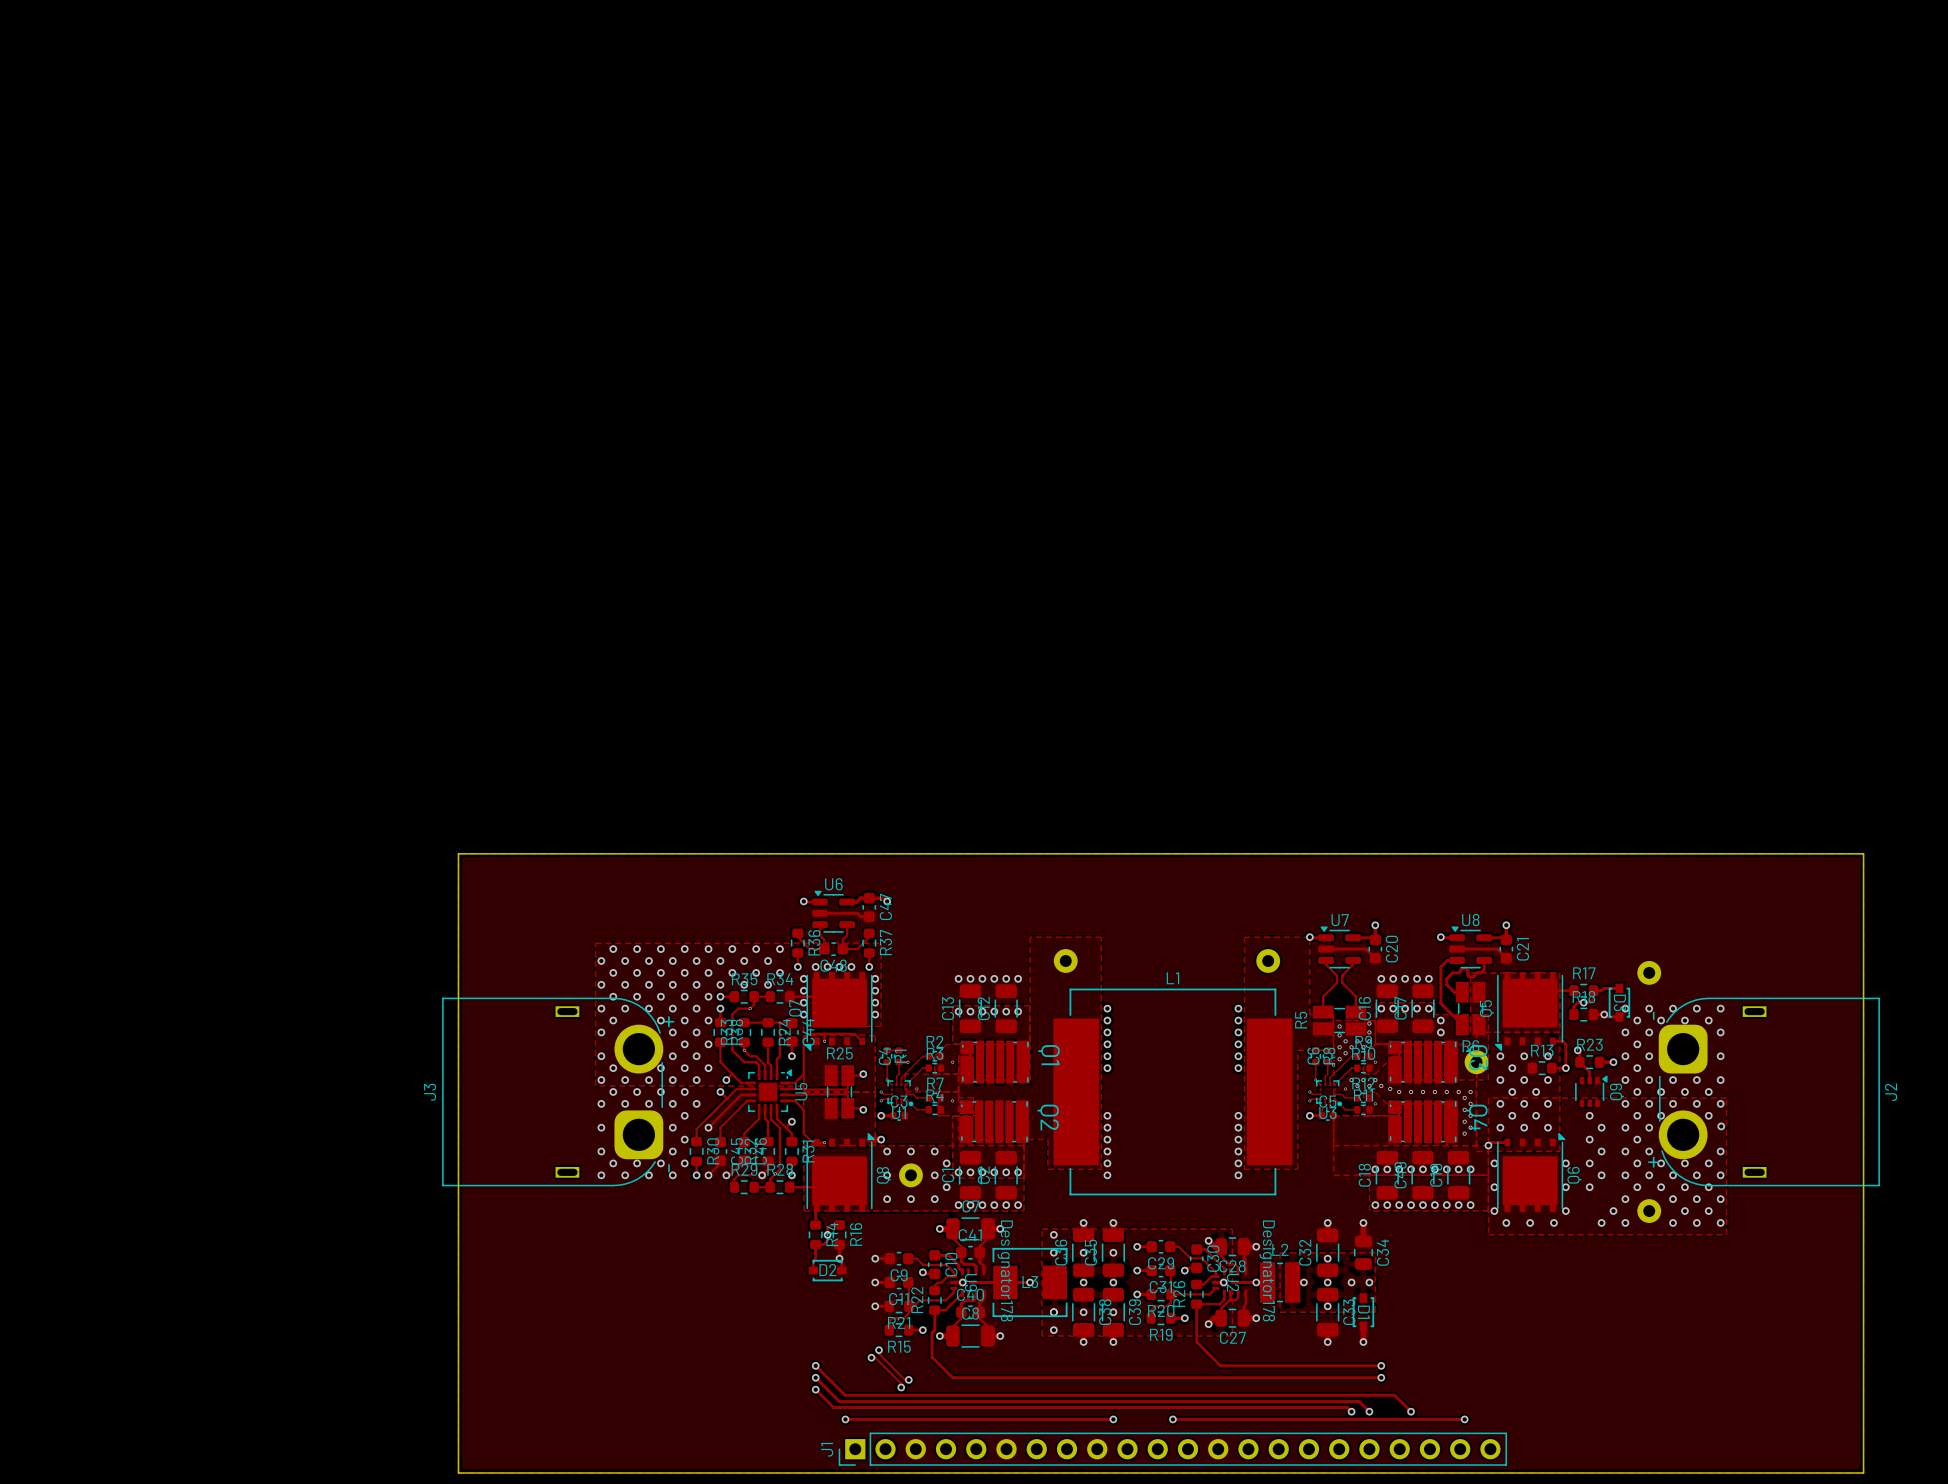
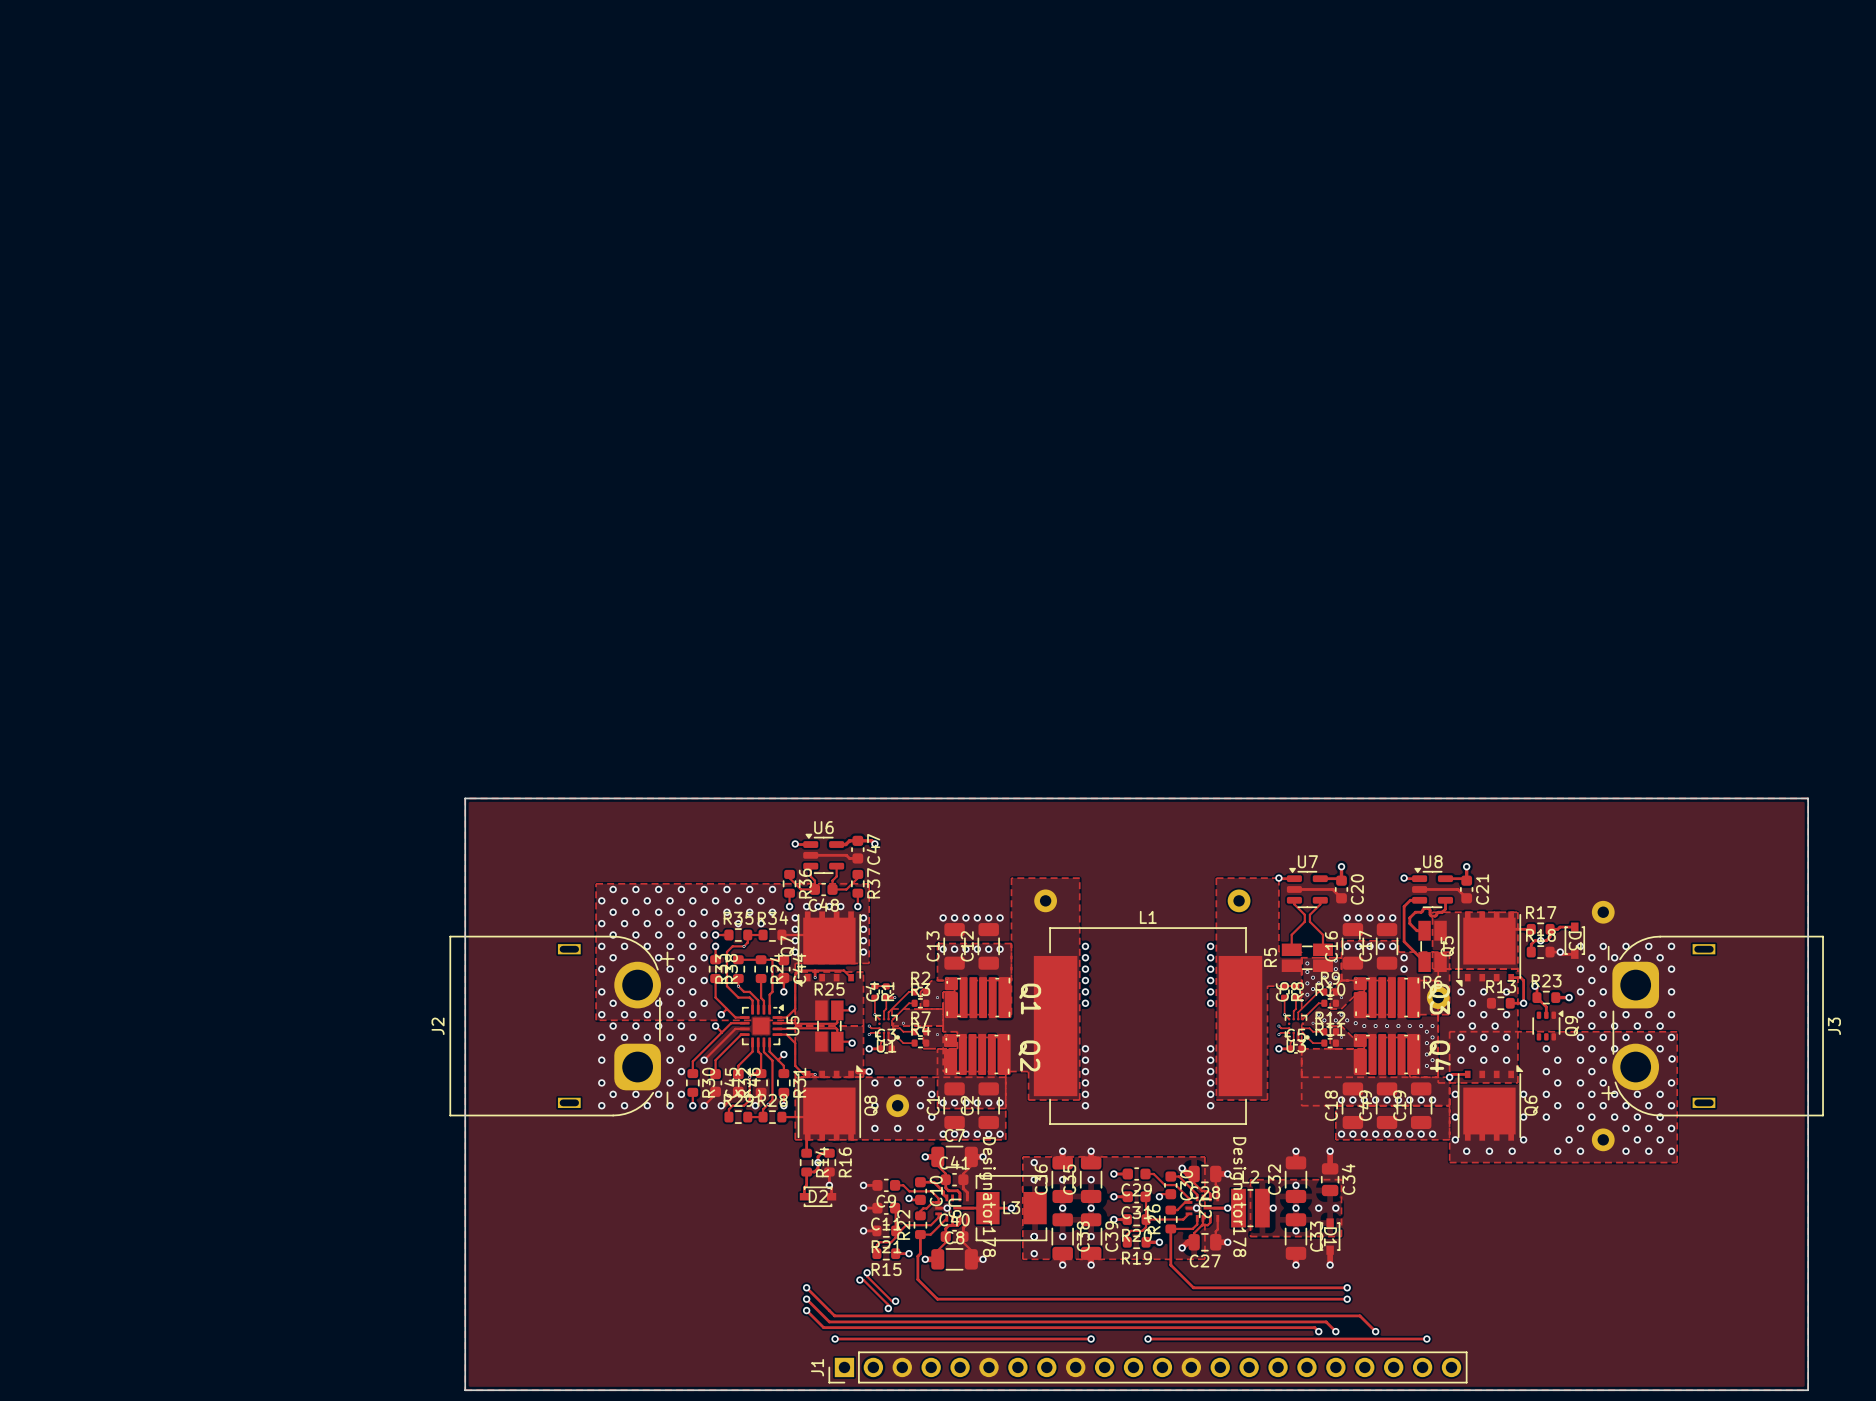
J3 name: J3 (430, 1092) -> J2 (438, 1026)
J2 name: J2 (1891, 1092) -> J3 (1834, 1026)

